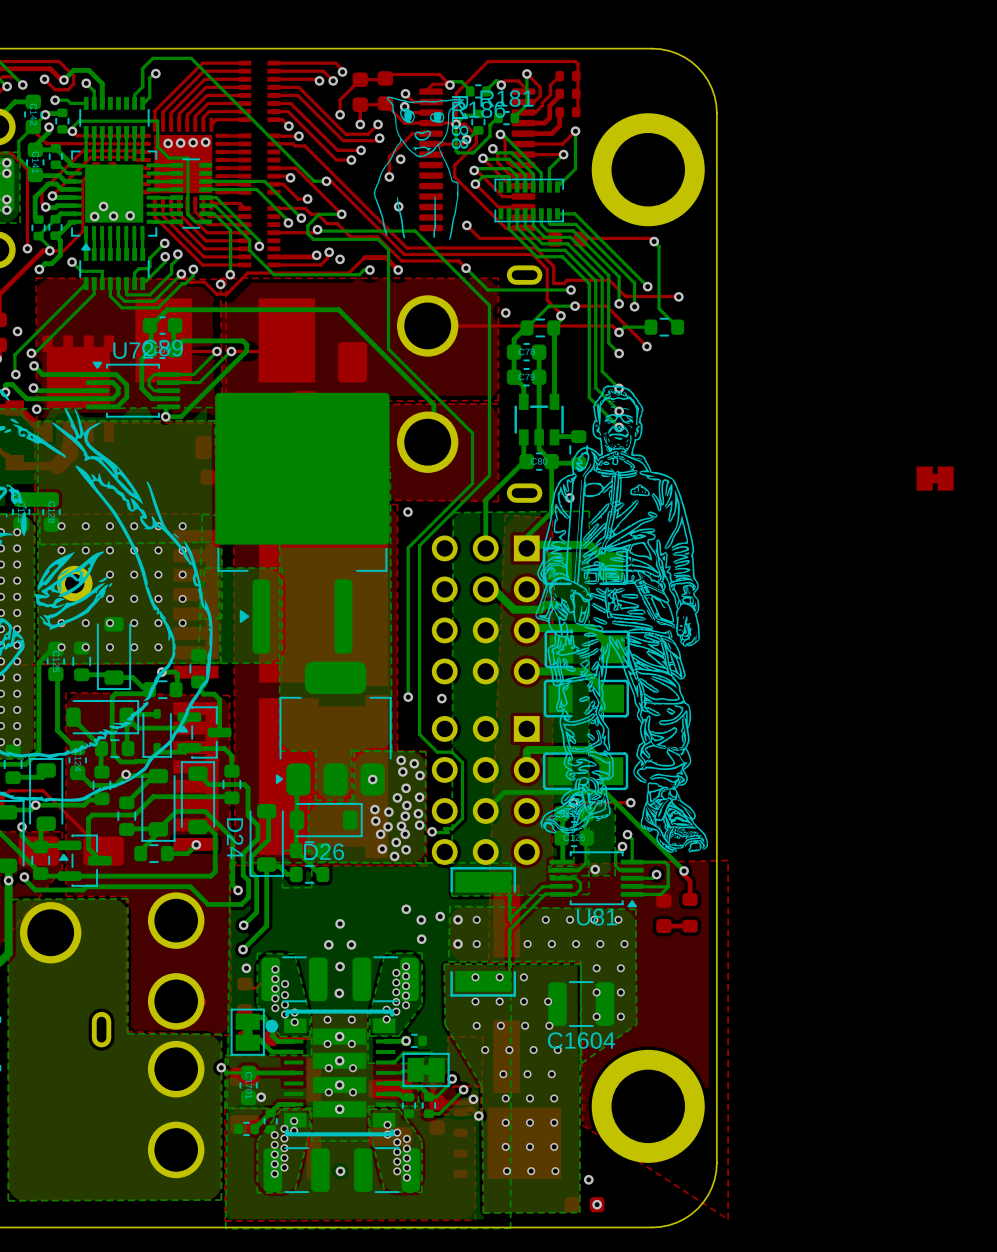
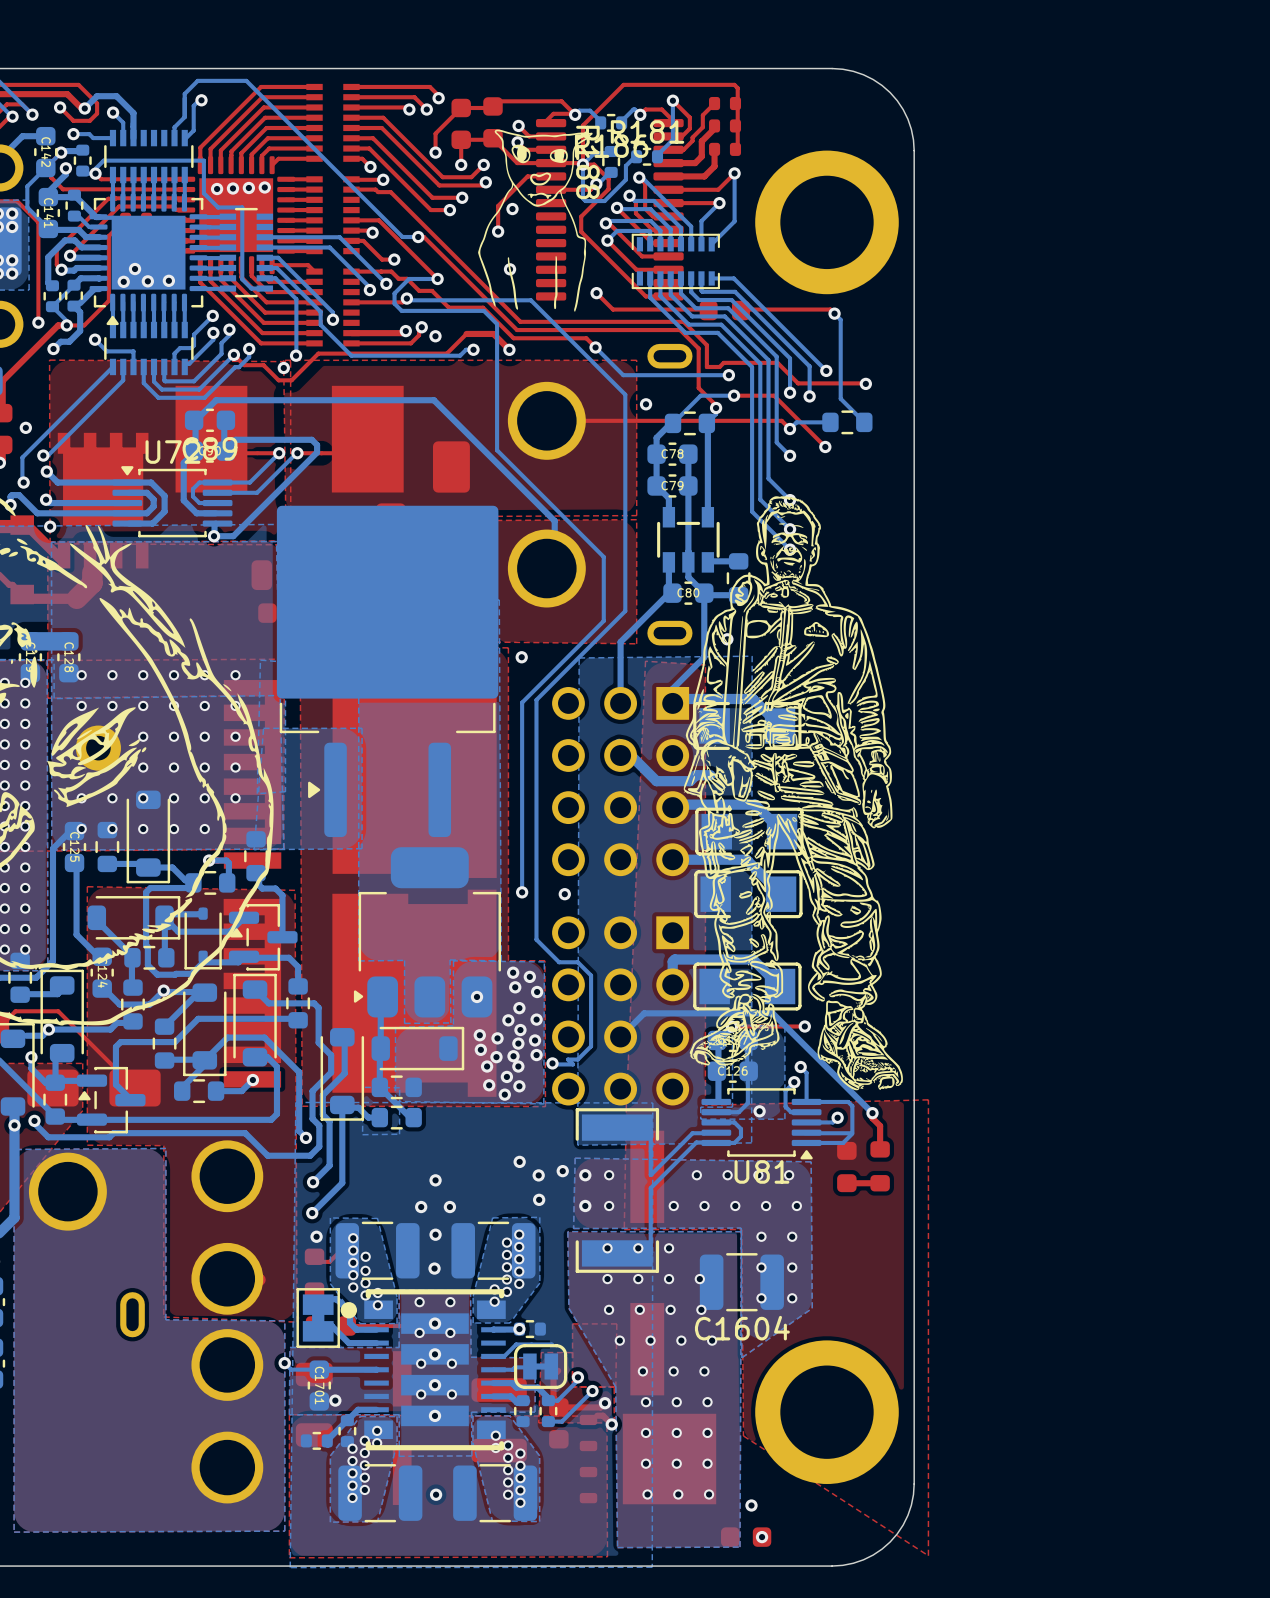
part: (935, 478) -> none
D24 name: D24 (235, 838) -> none
D26 name: D26 (324, 851) -> none
part footprint: [402, 1052, 450, 1088] -> [514, 1344, 568, 1389]

